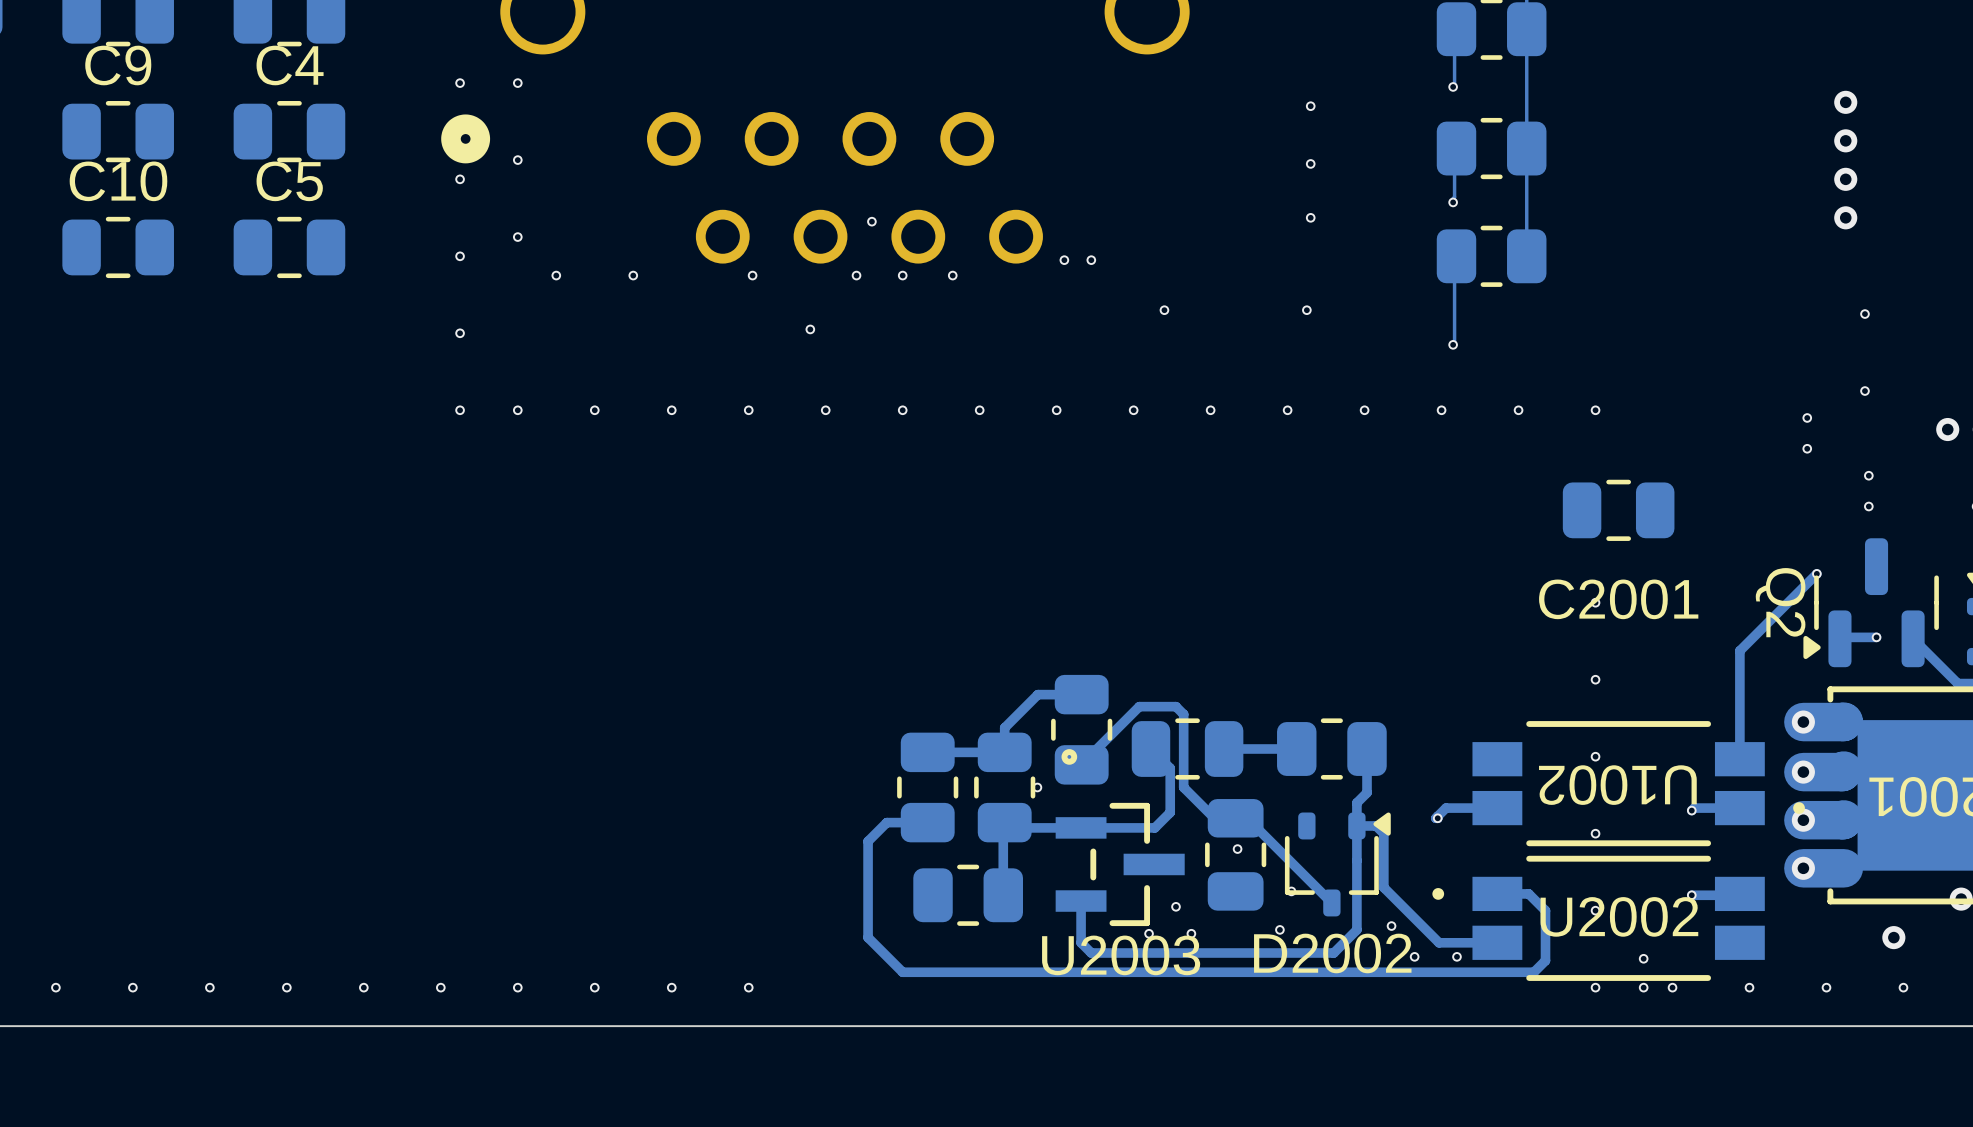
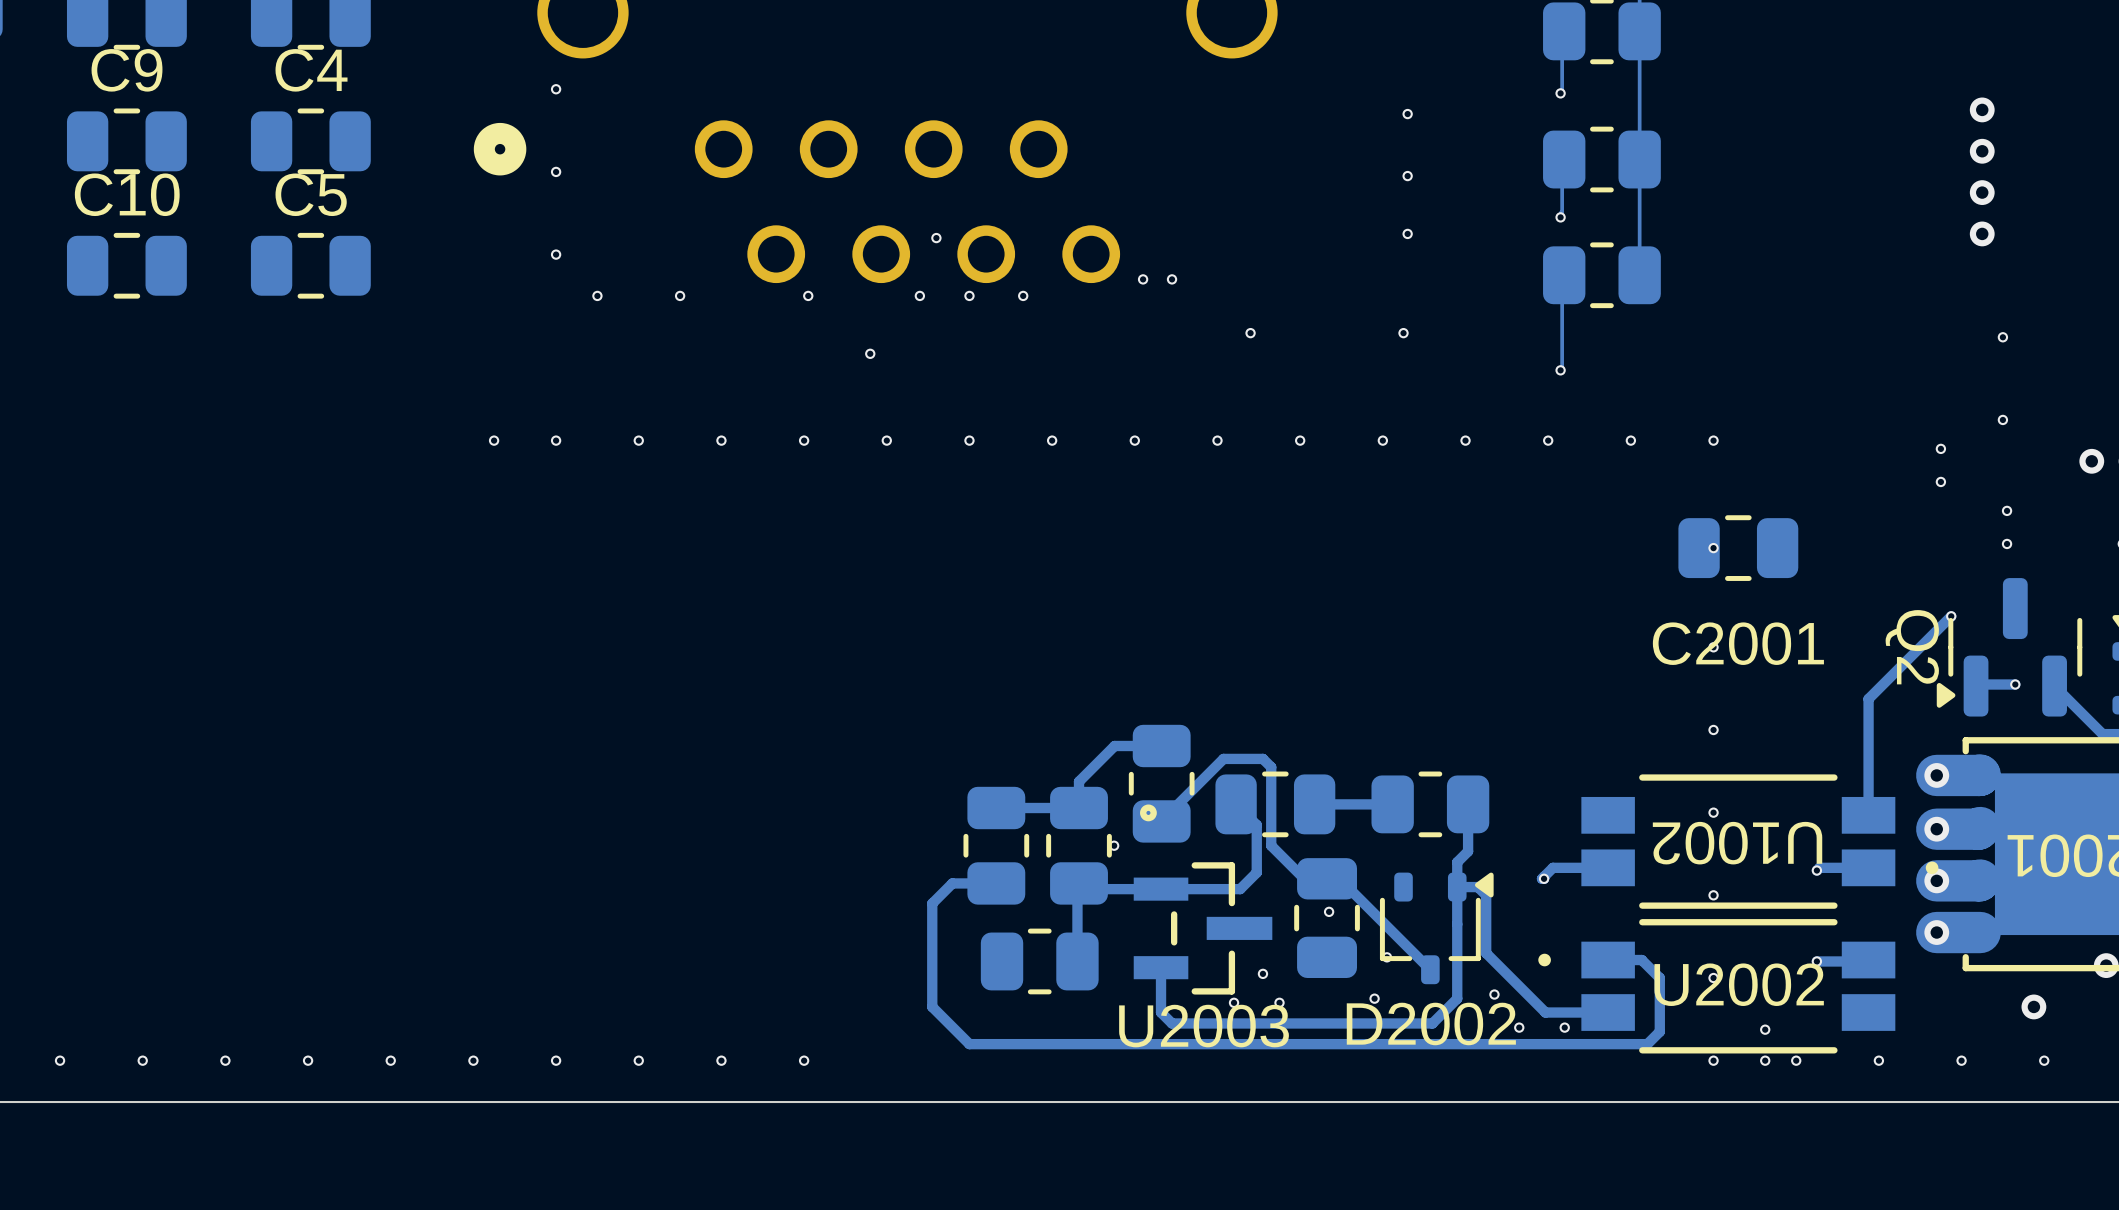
via: (460, 83) -> none
via: (460, 179) -> none
via: (460, 256) -> none
via: (460, 333) -> none
via: none -> (1713, 548)

